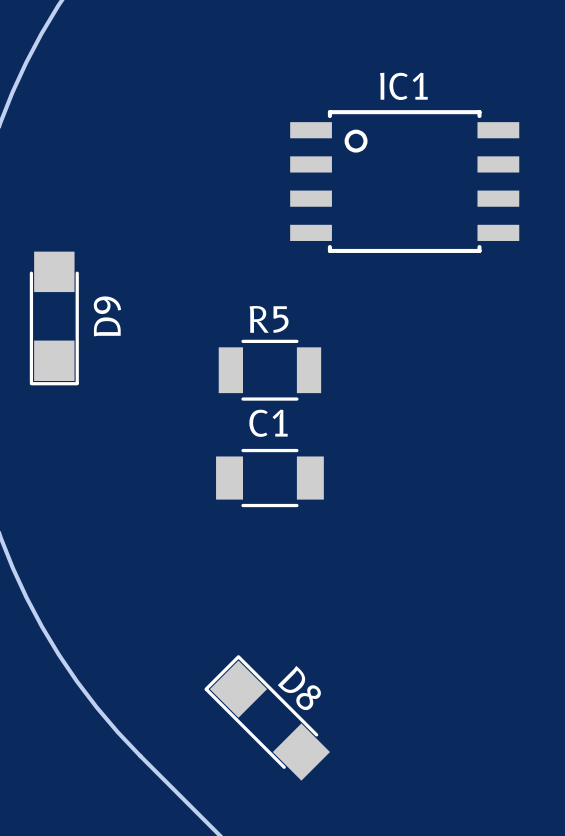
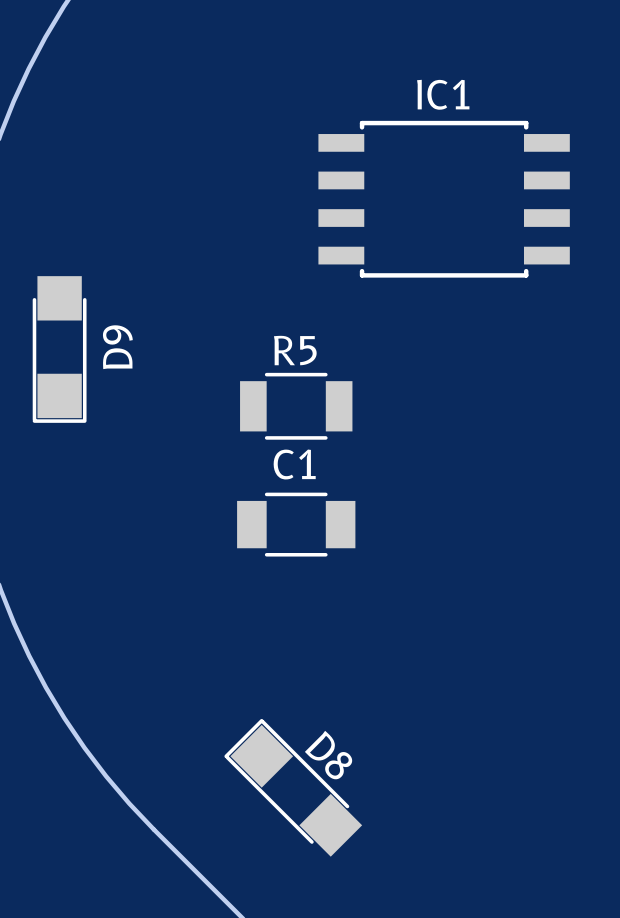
IC1 footprint: [290, 110, 520, 253] -> [318, 120, 570, 278]

